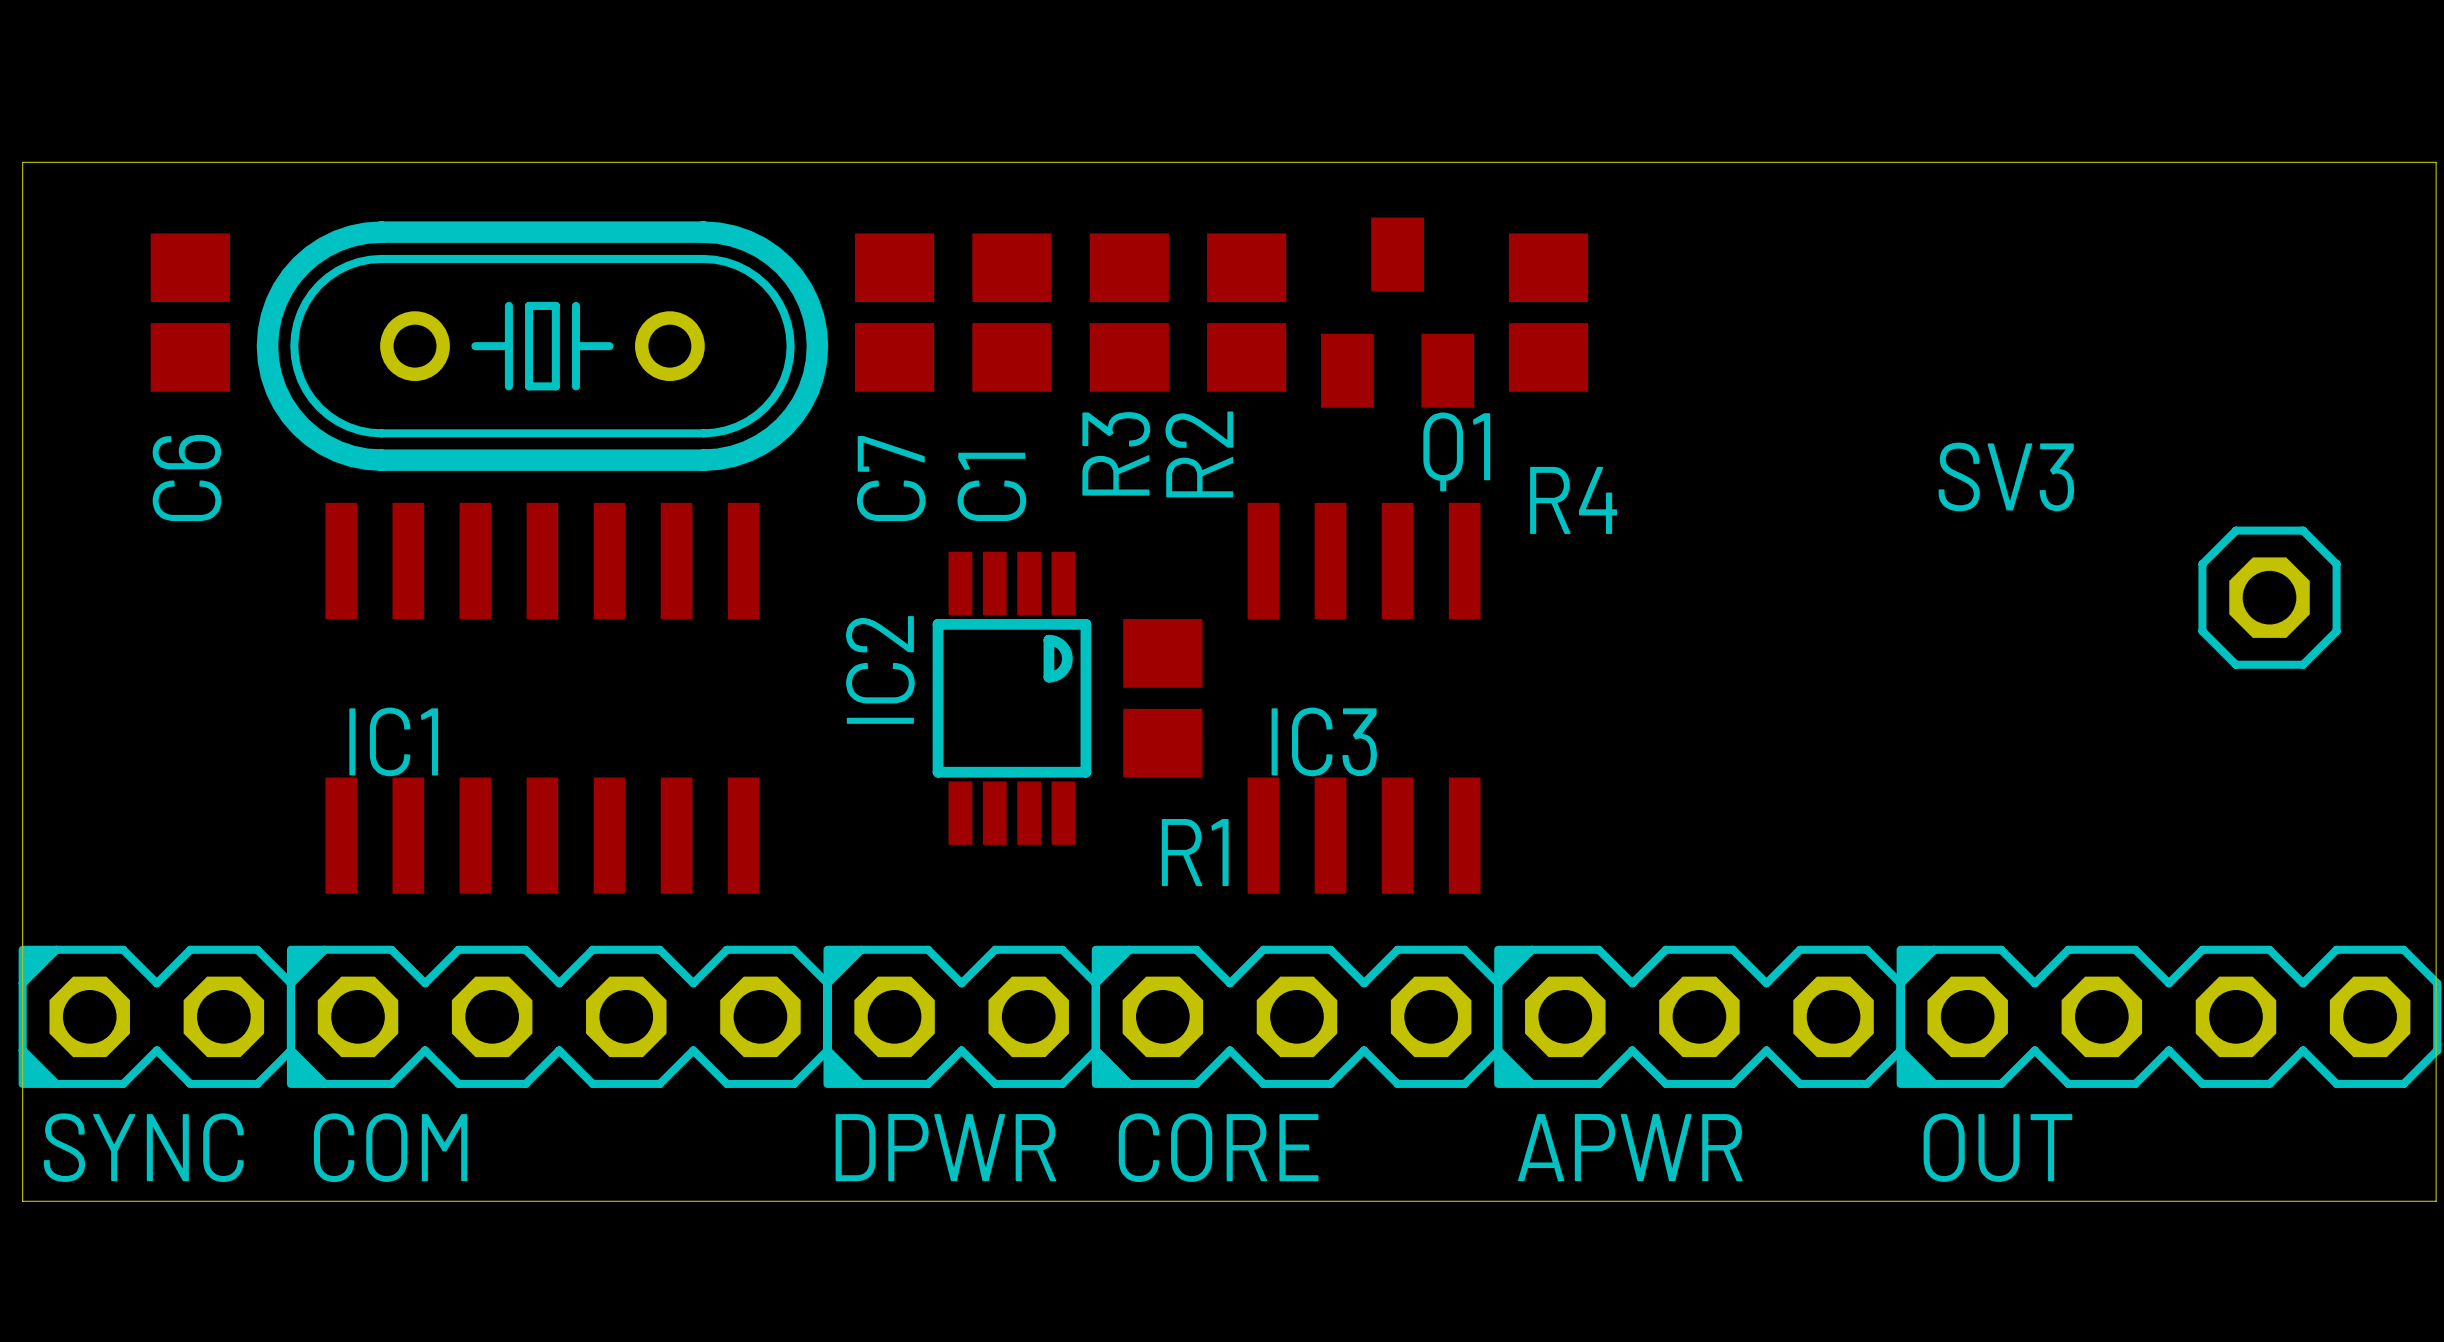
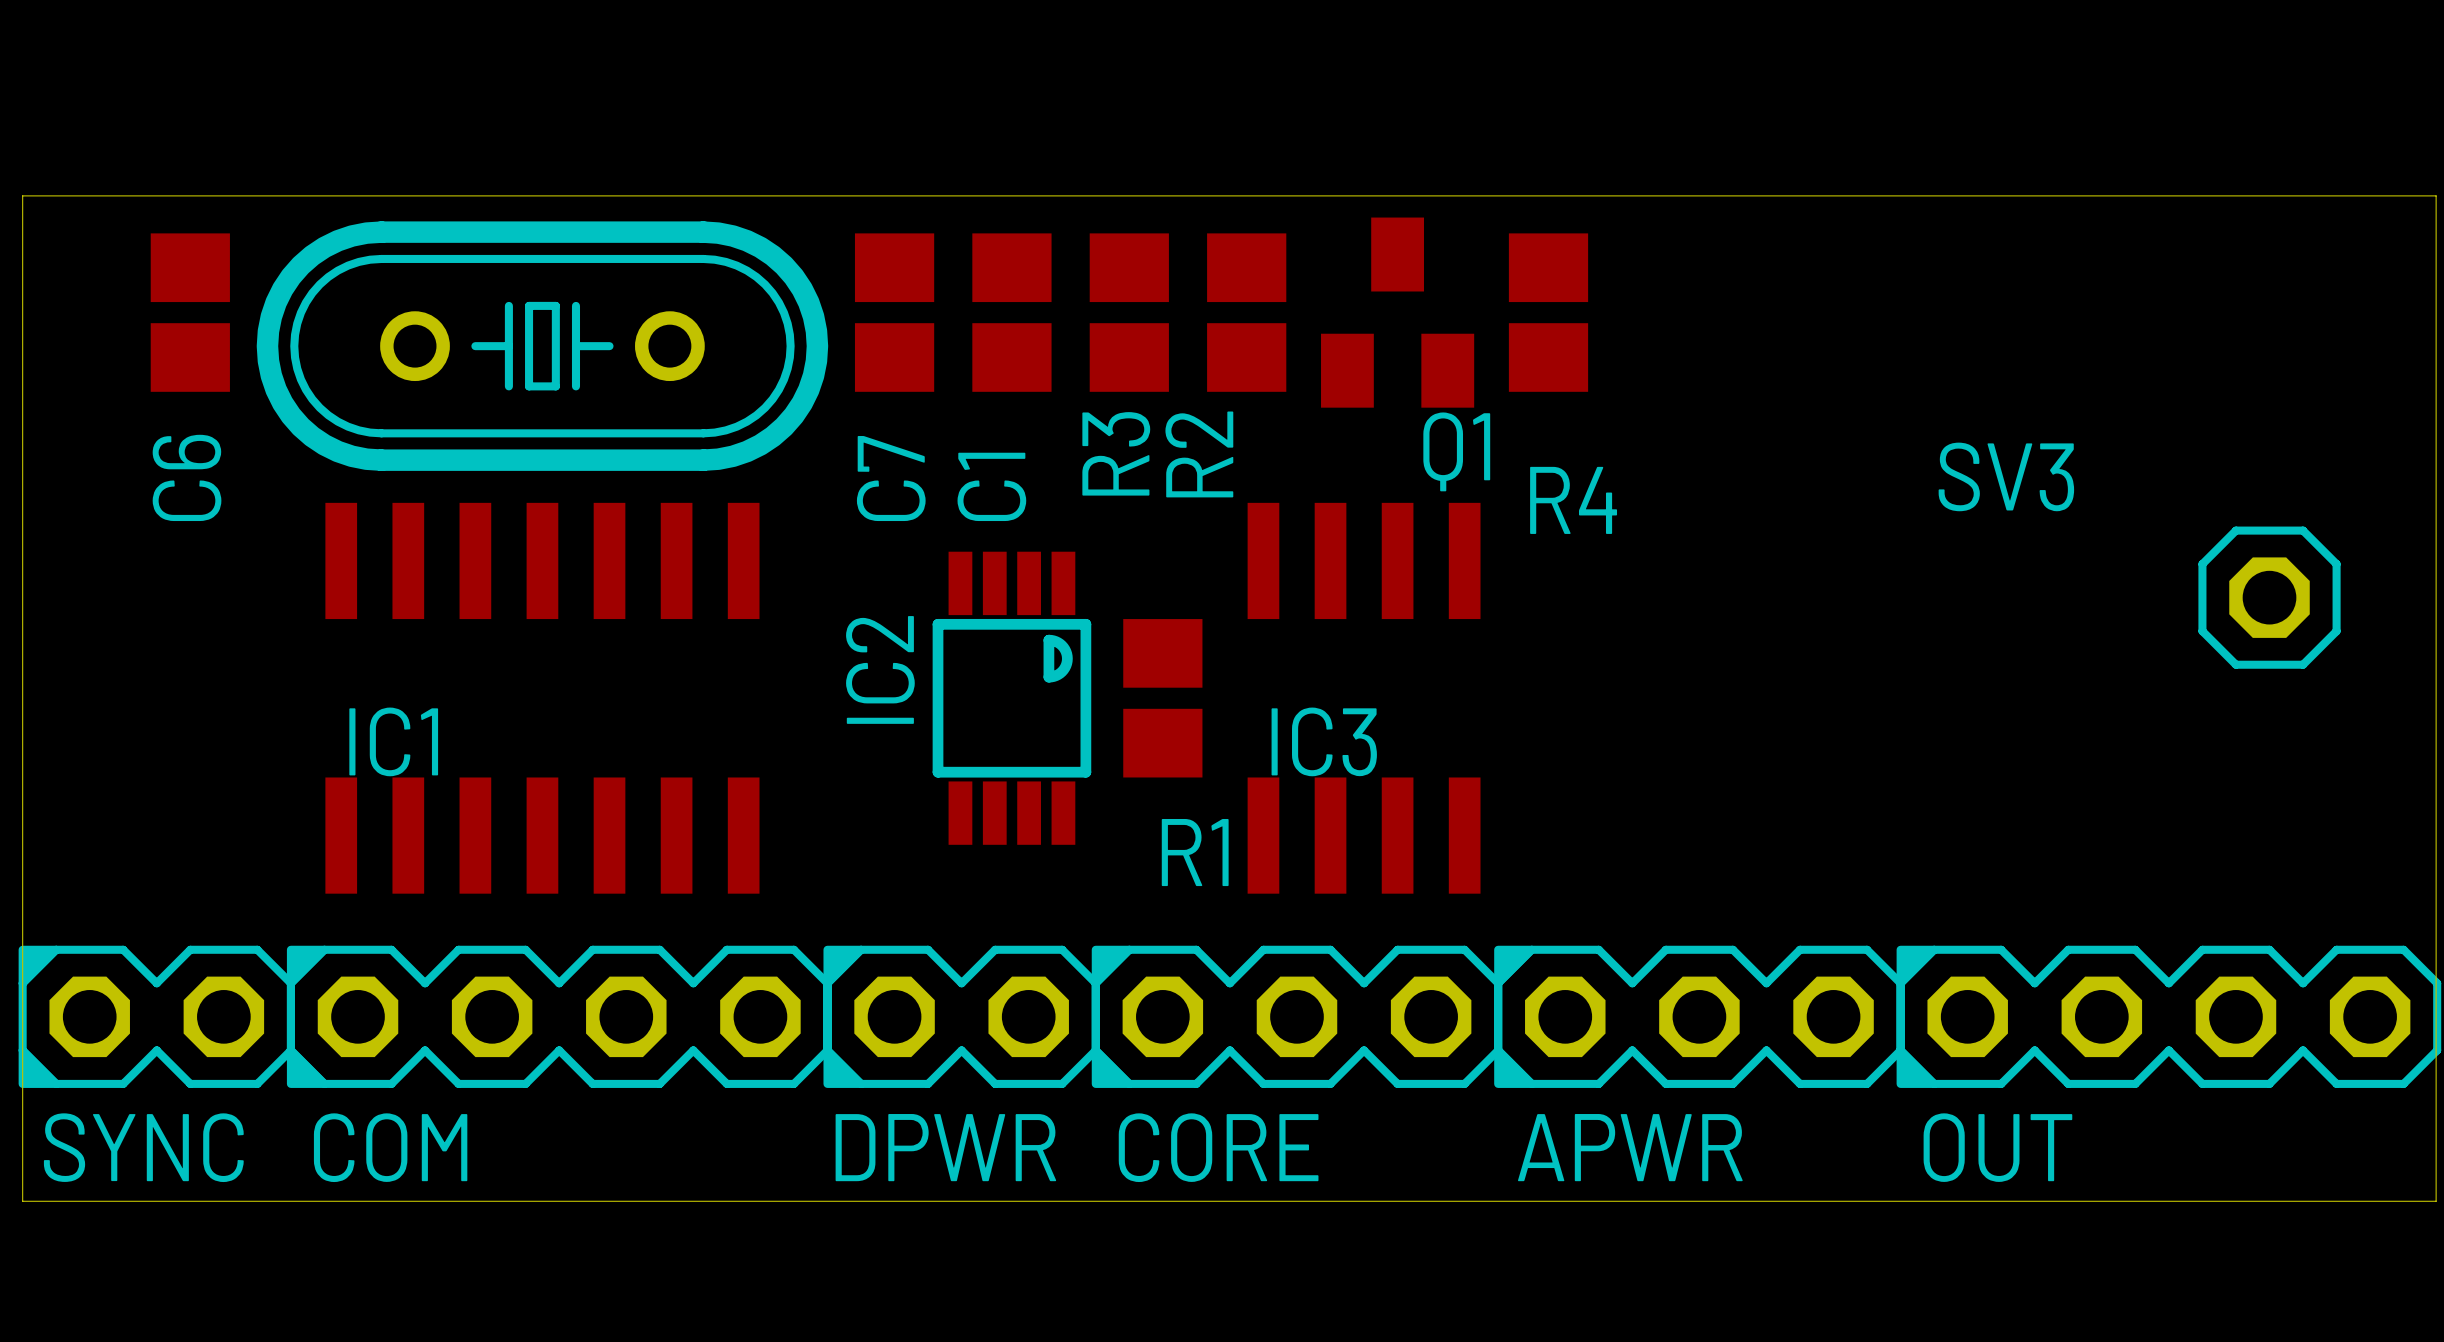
board edge: (22, 195) (22, 162) (2436, 162) (2436, 195) -> (22, 195) (2436, 195)

